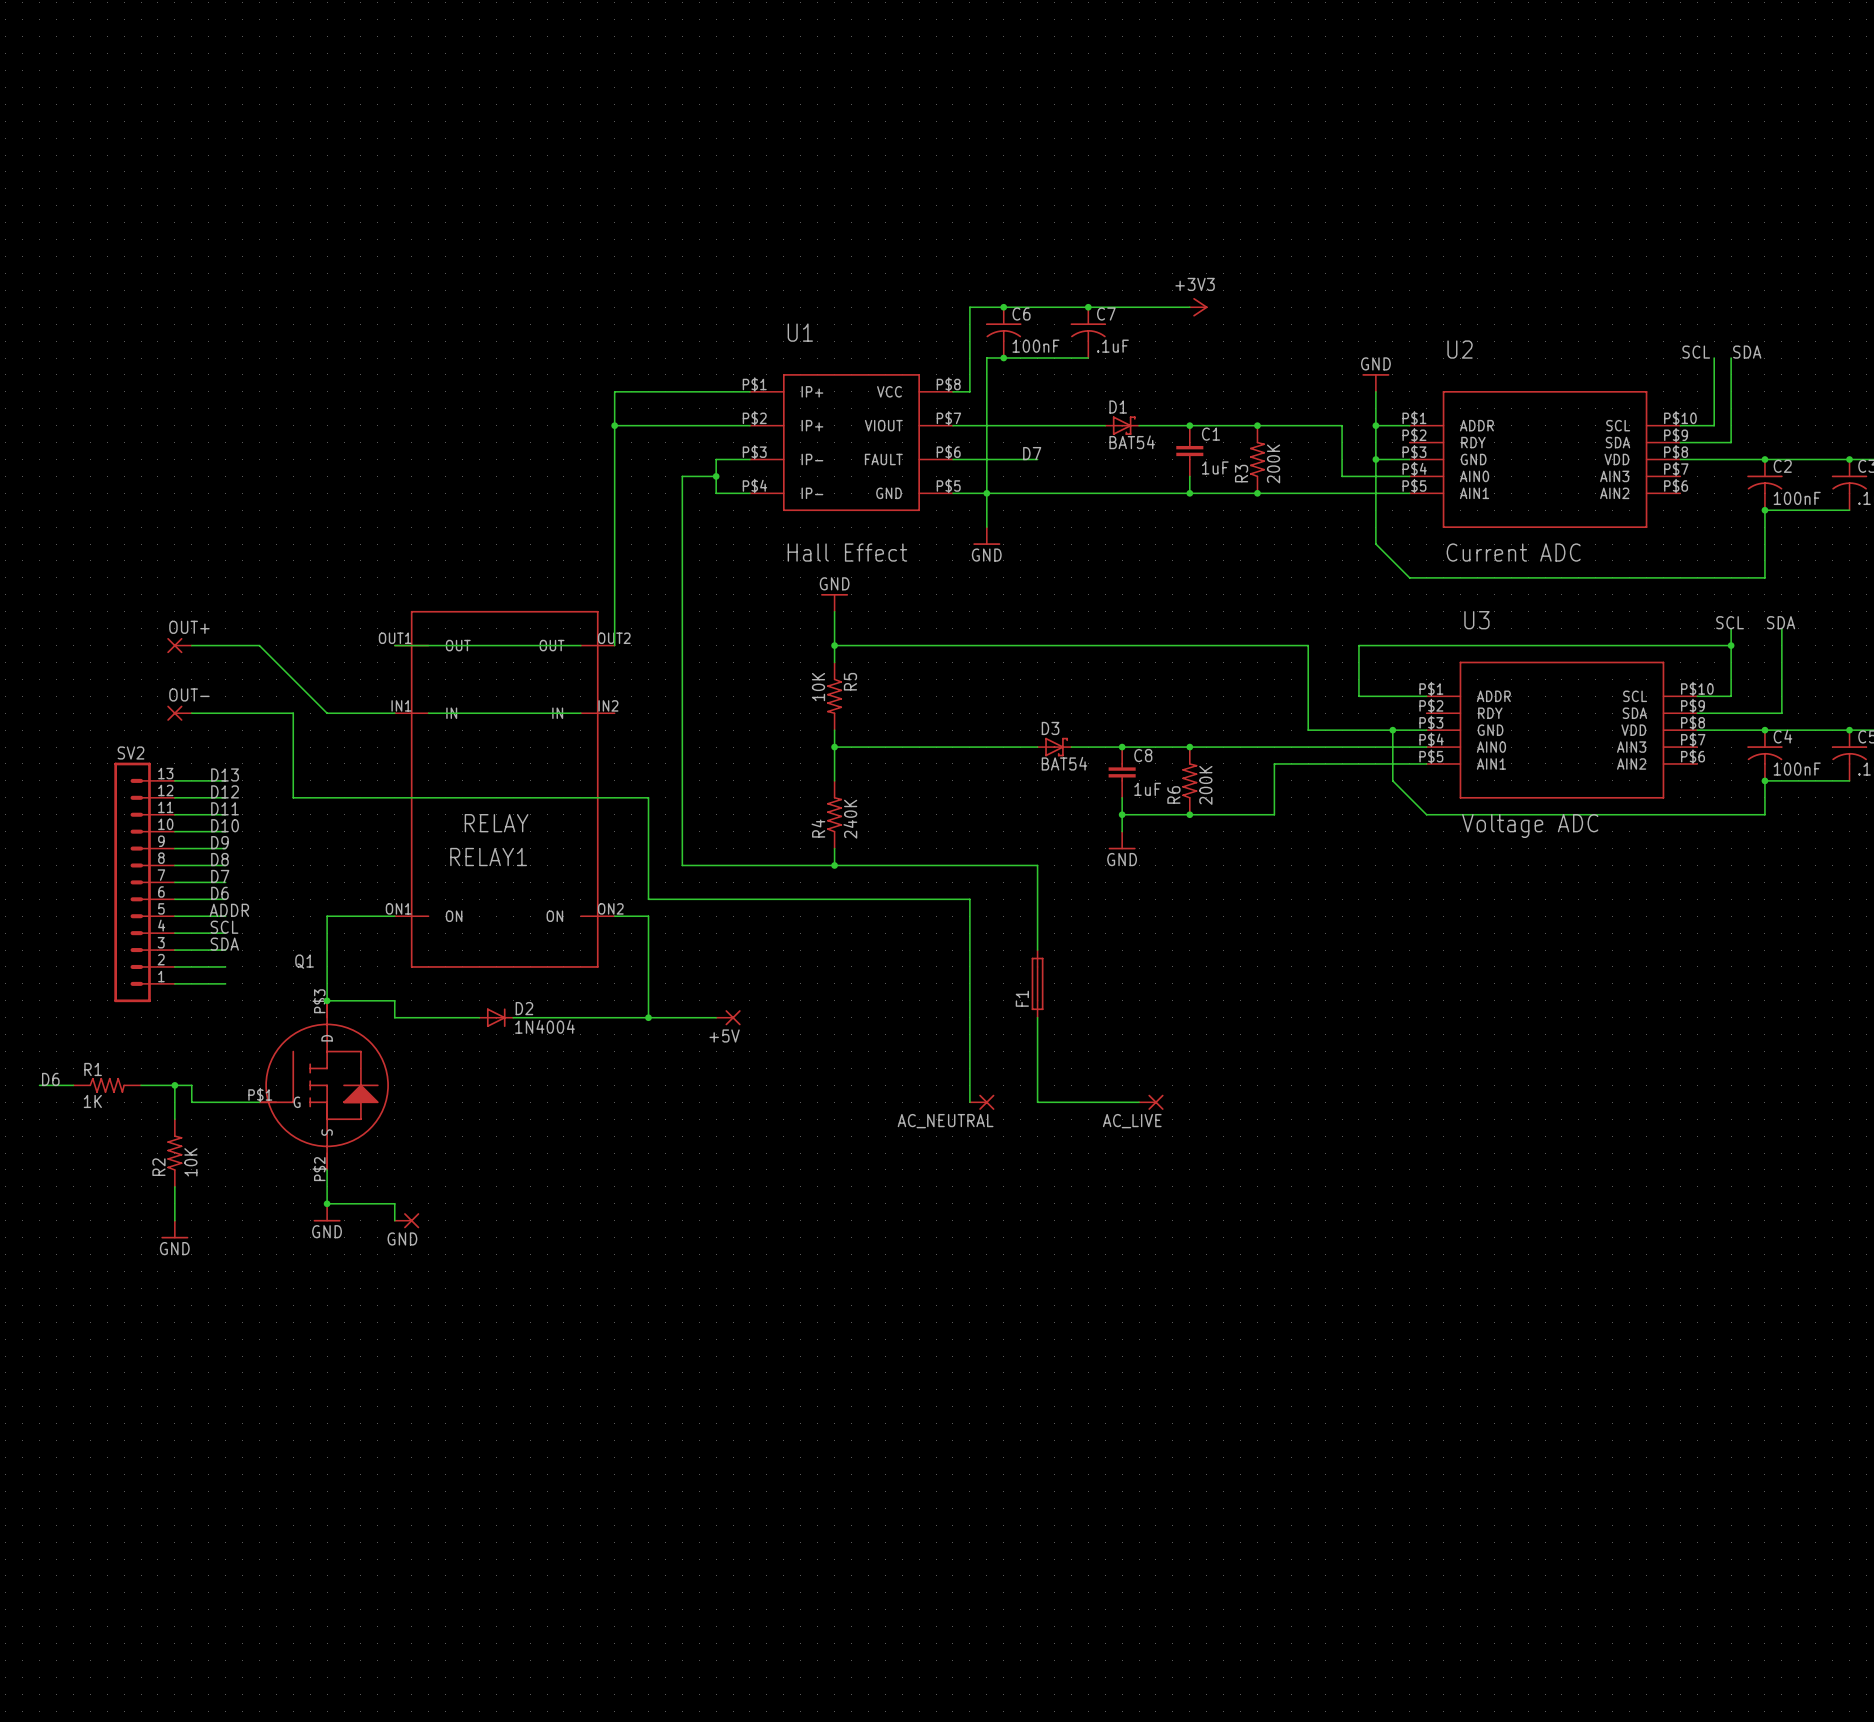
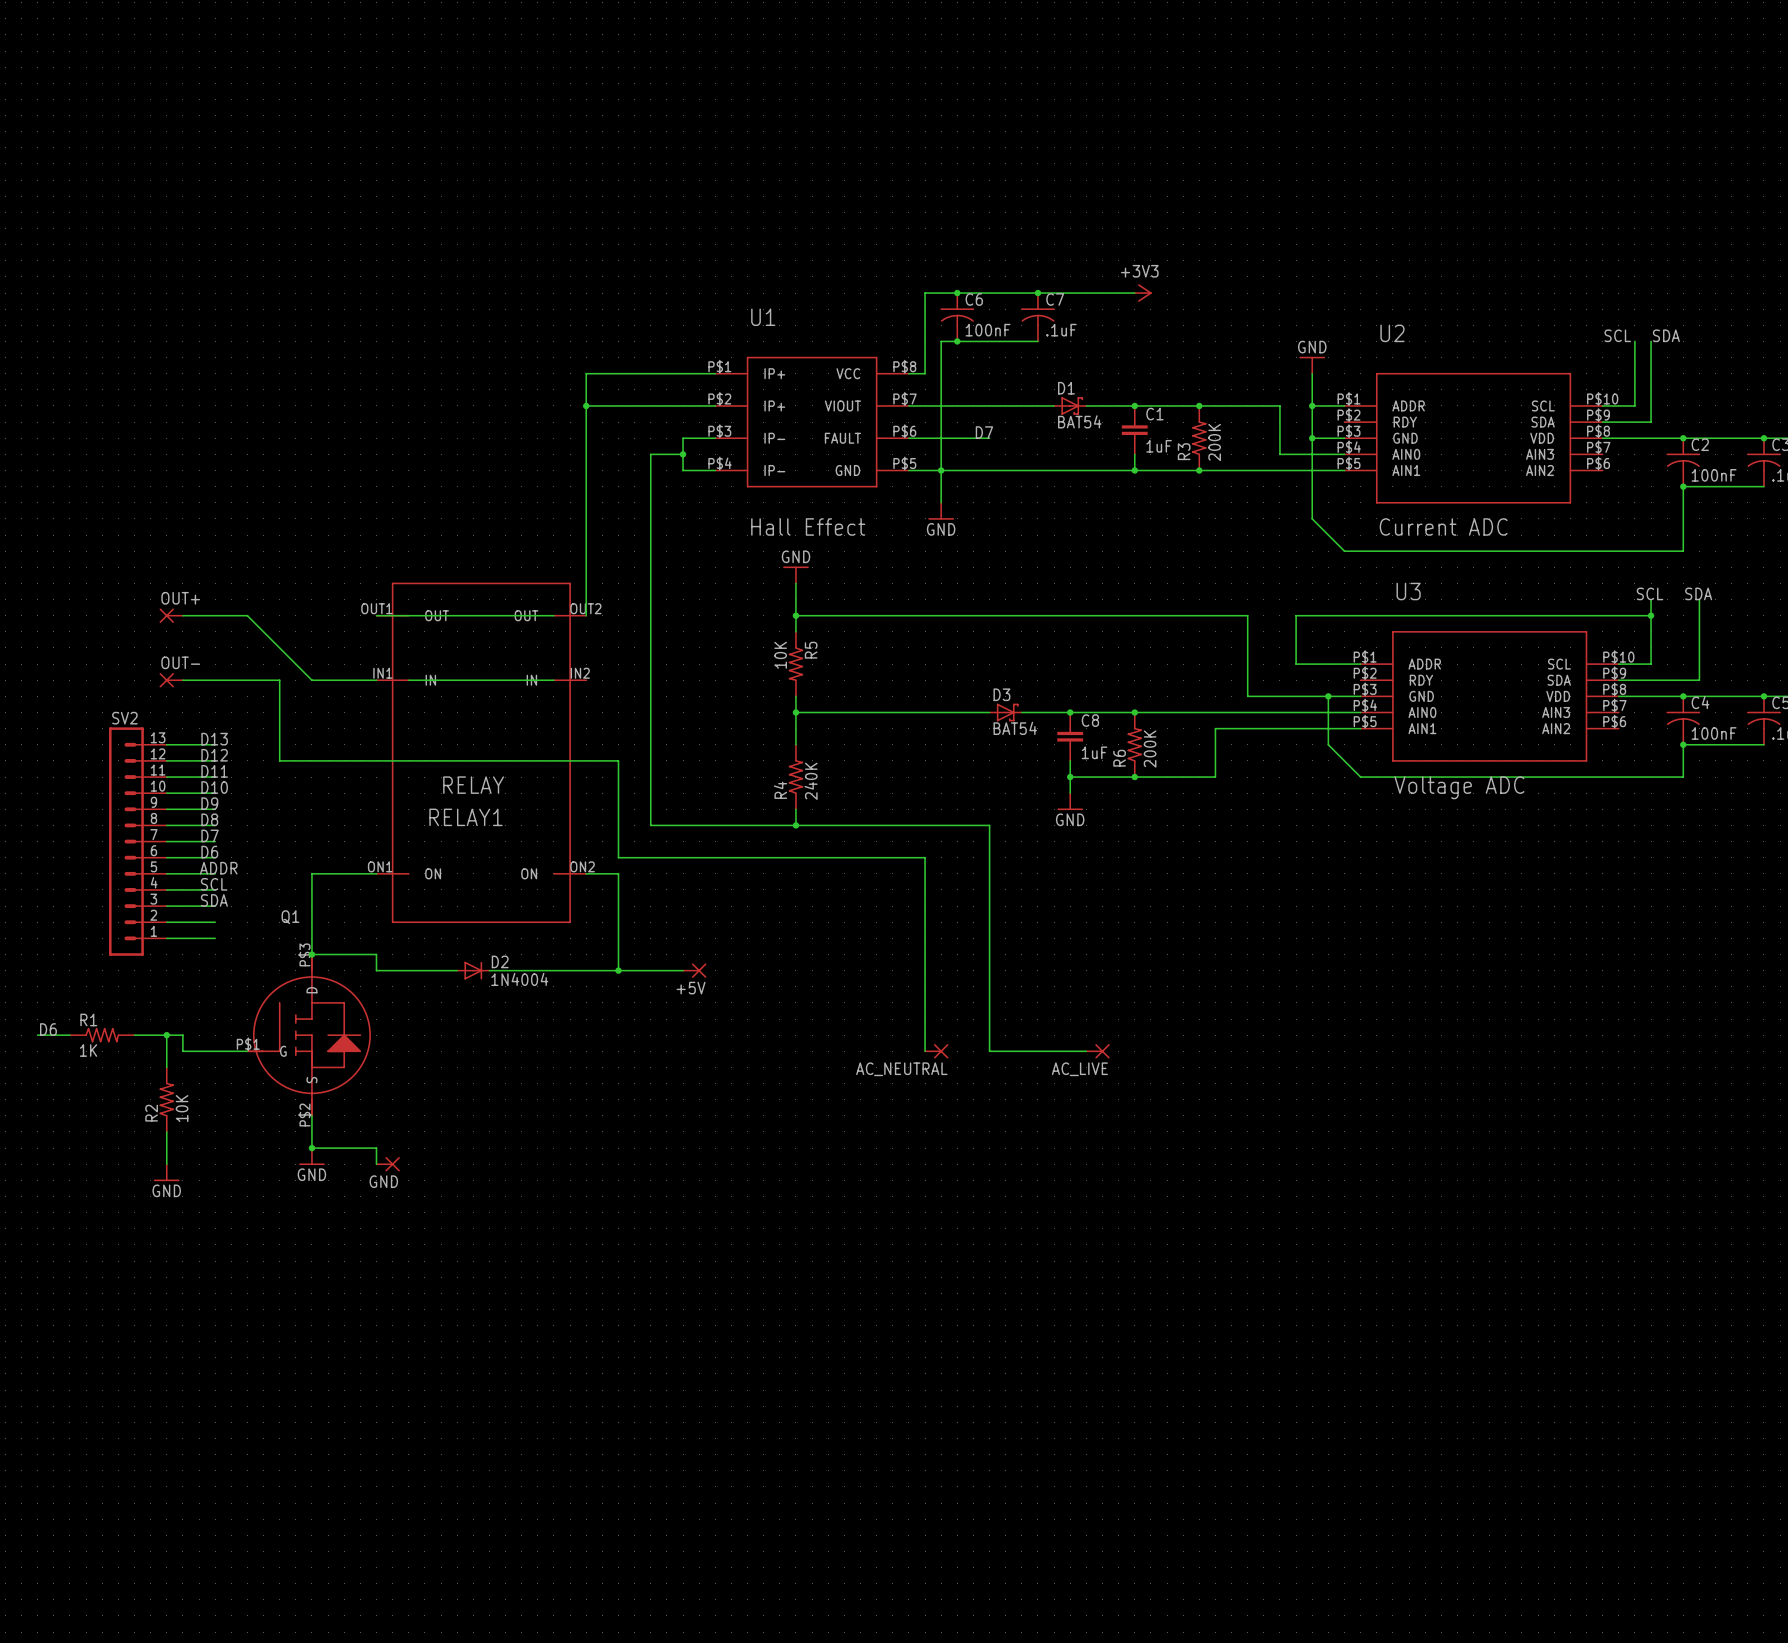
F1: (1037, 983) -> none

